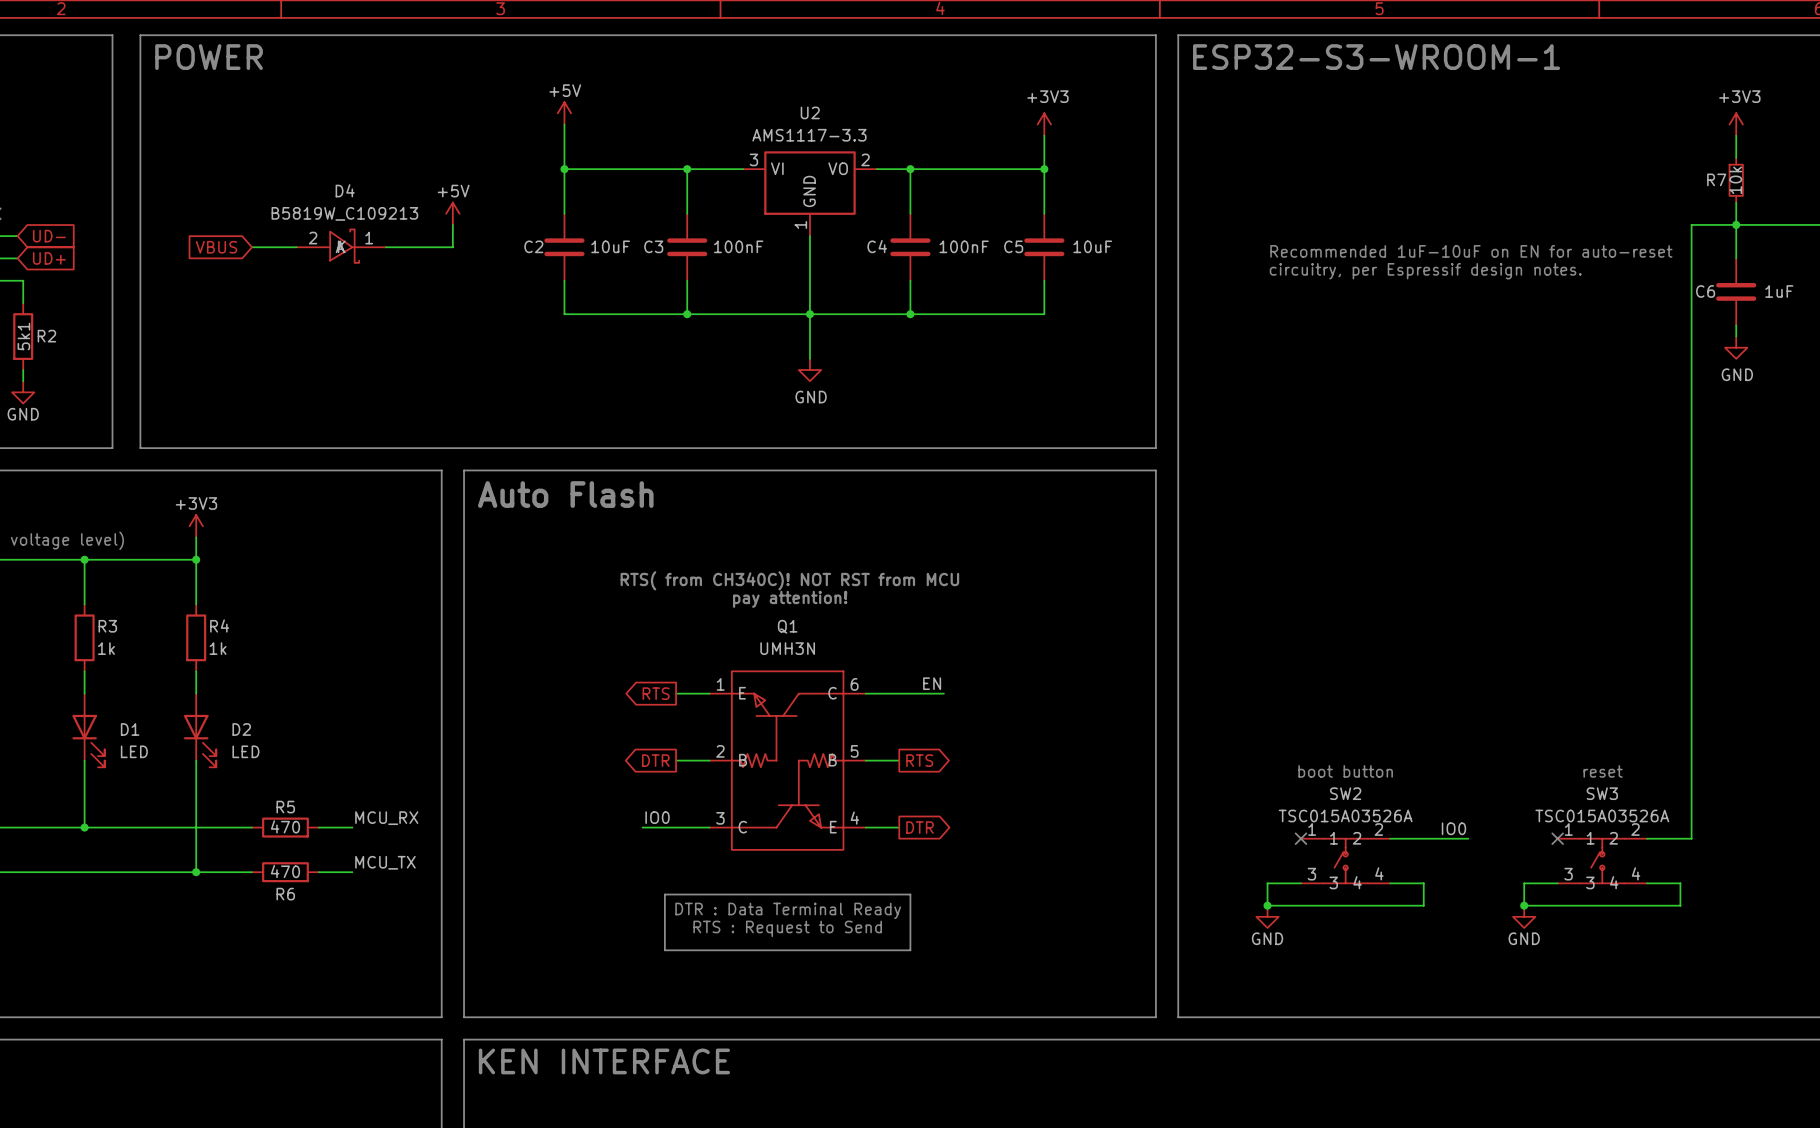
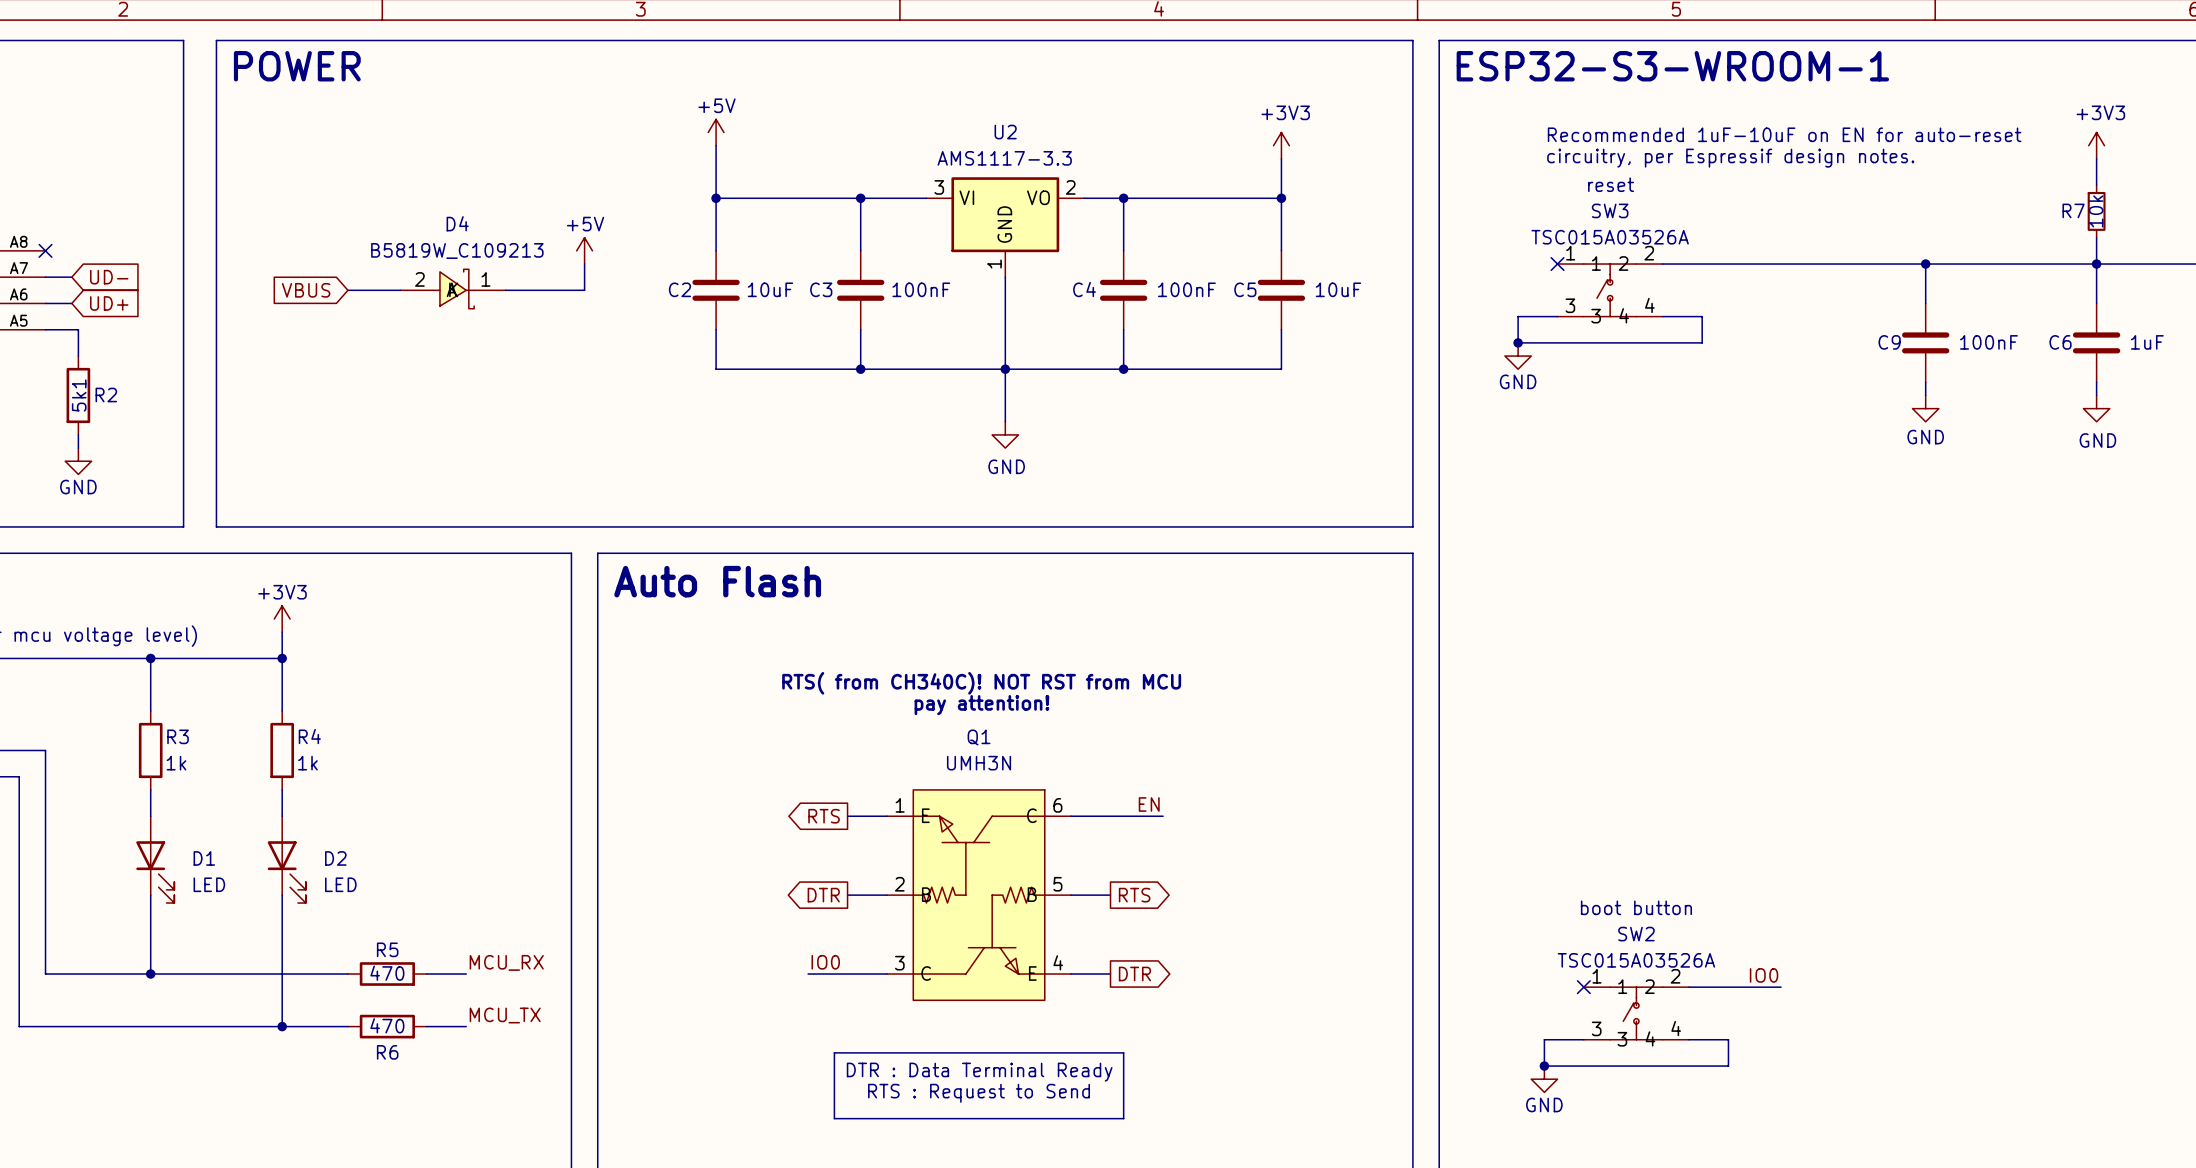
text: none -> reset (1611, 184)
no-connect mark: none -> (1557, 264)
wire: none -> (1925, 264) (1925, 303)
junction: none -> (1925, 264)
wire: (1691, 224) (1691, 838) (1646, 838) -> (2044, 264) (1662, 264)
text position: Recommended 1uF-10uF on EN for auto-reset (1471, 251) -> Recommended 1uF-10uF on EN for auto-reset (1784, 134)
wire: none -> (1557, 316) (1518, 316) (1518, 342) (1702, 342) (1702, 316) (1662, 316)
text position: circuitry, per Espressif design notes. (1425, 271) -> circuitry, per Espressif design notes. (1730, 158)
junction: none -> (1518, 342)
C9: none -> 100nF (1925, 342)
power symbol: none -> GND (1518, 356)
wire: none -> (1925, 382) (1925, 395)
power symbol: none -> GND (1925, 408)
text: reset (1603, 771) -> none
no-connect mark: (1557, 838) -> none
SW3 position: (1602, 861) -> (1610, 290)
wire: (1557, 883) (1524, 883) (1524, 905) (1680, 905) (1680, 883) (1646, 883) -> none
junction: (1524, 905) -> none
power symbol: GND (1524, 916) -> none

